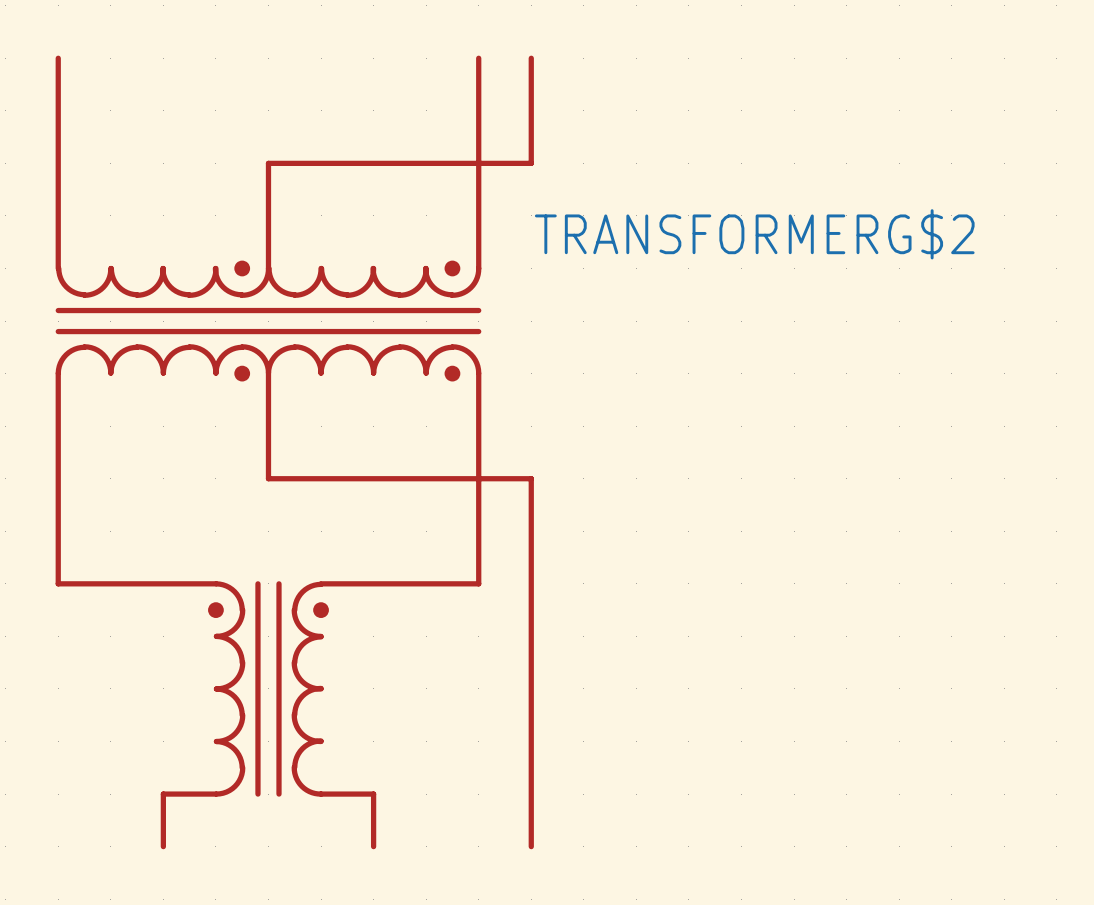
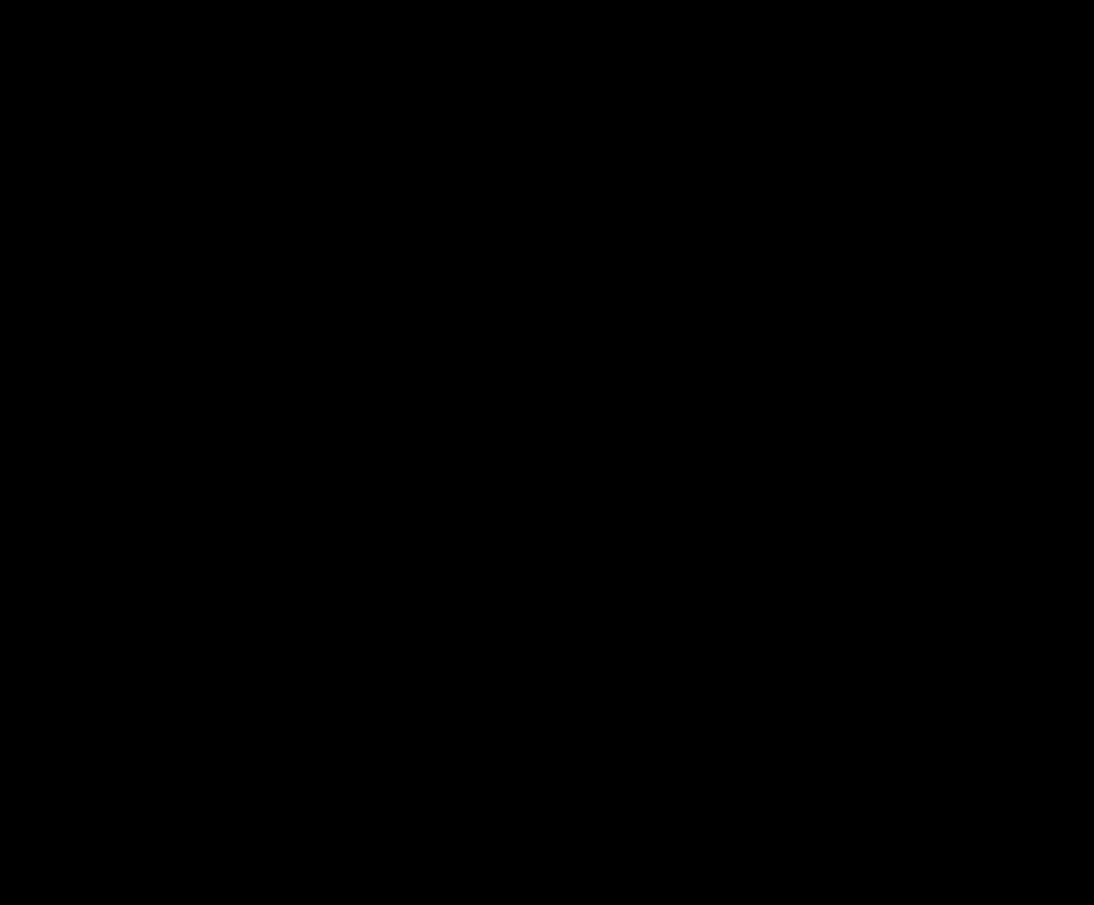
TRANSFORMERG$2: (294, 452) -> none

